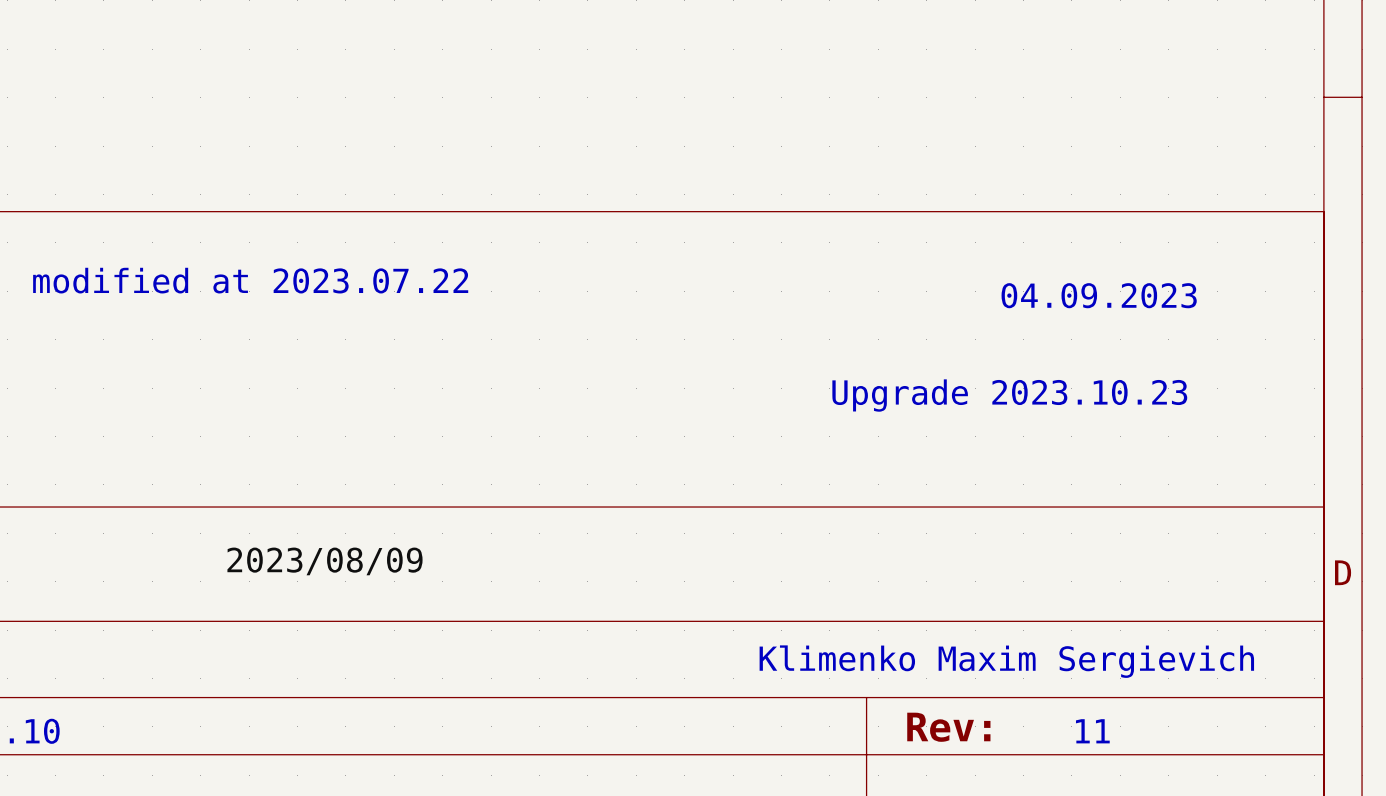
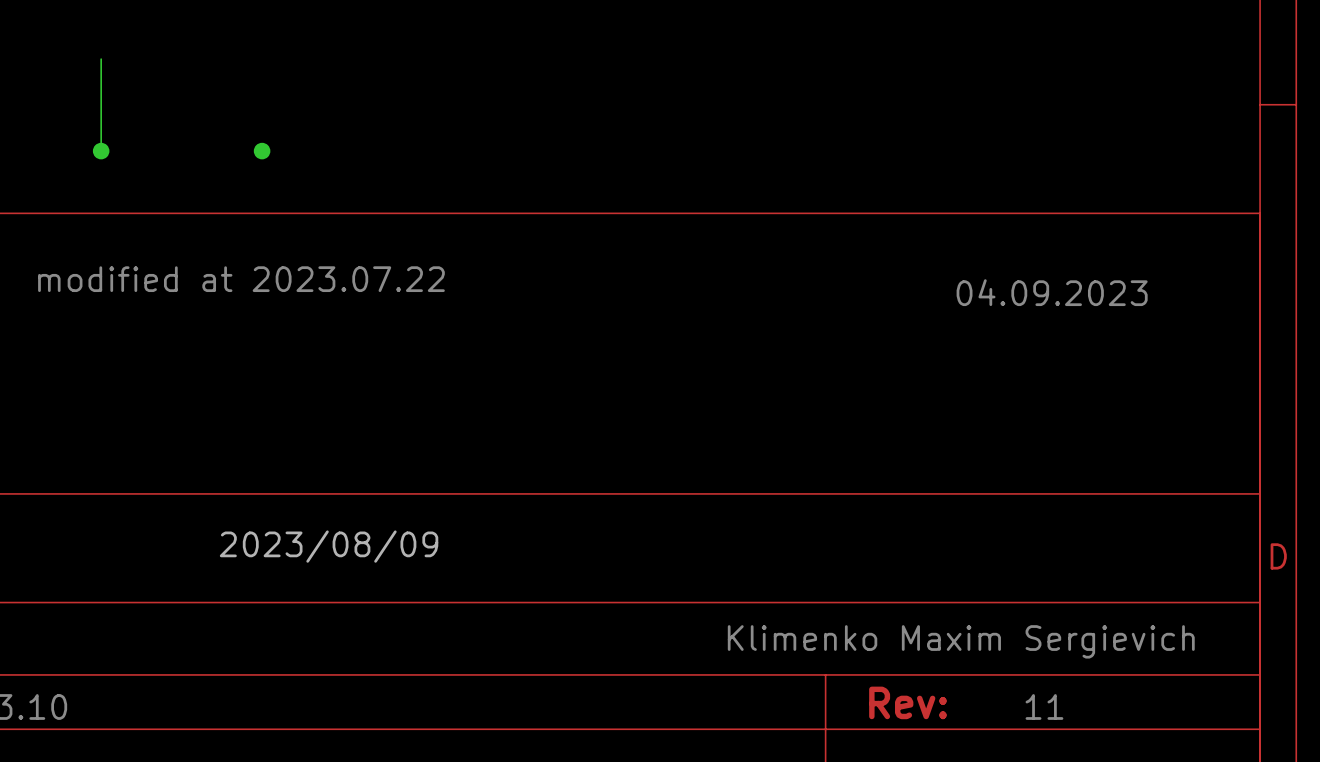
wire: none -> (101, 59) (101, 151)
junction: none -> (101, 151)
junction: none -> (262, 151)
text: Upgrade 2023.10.23 (1009, 395) -> none

